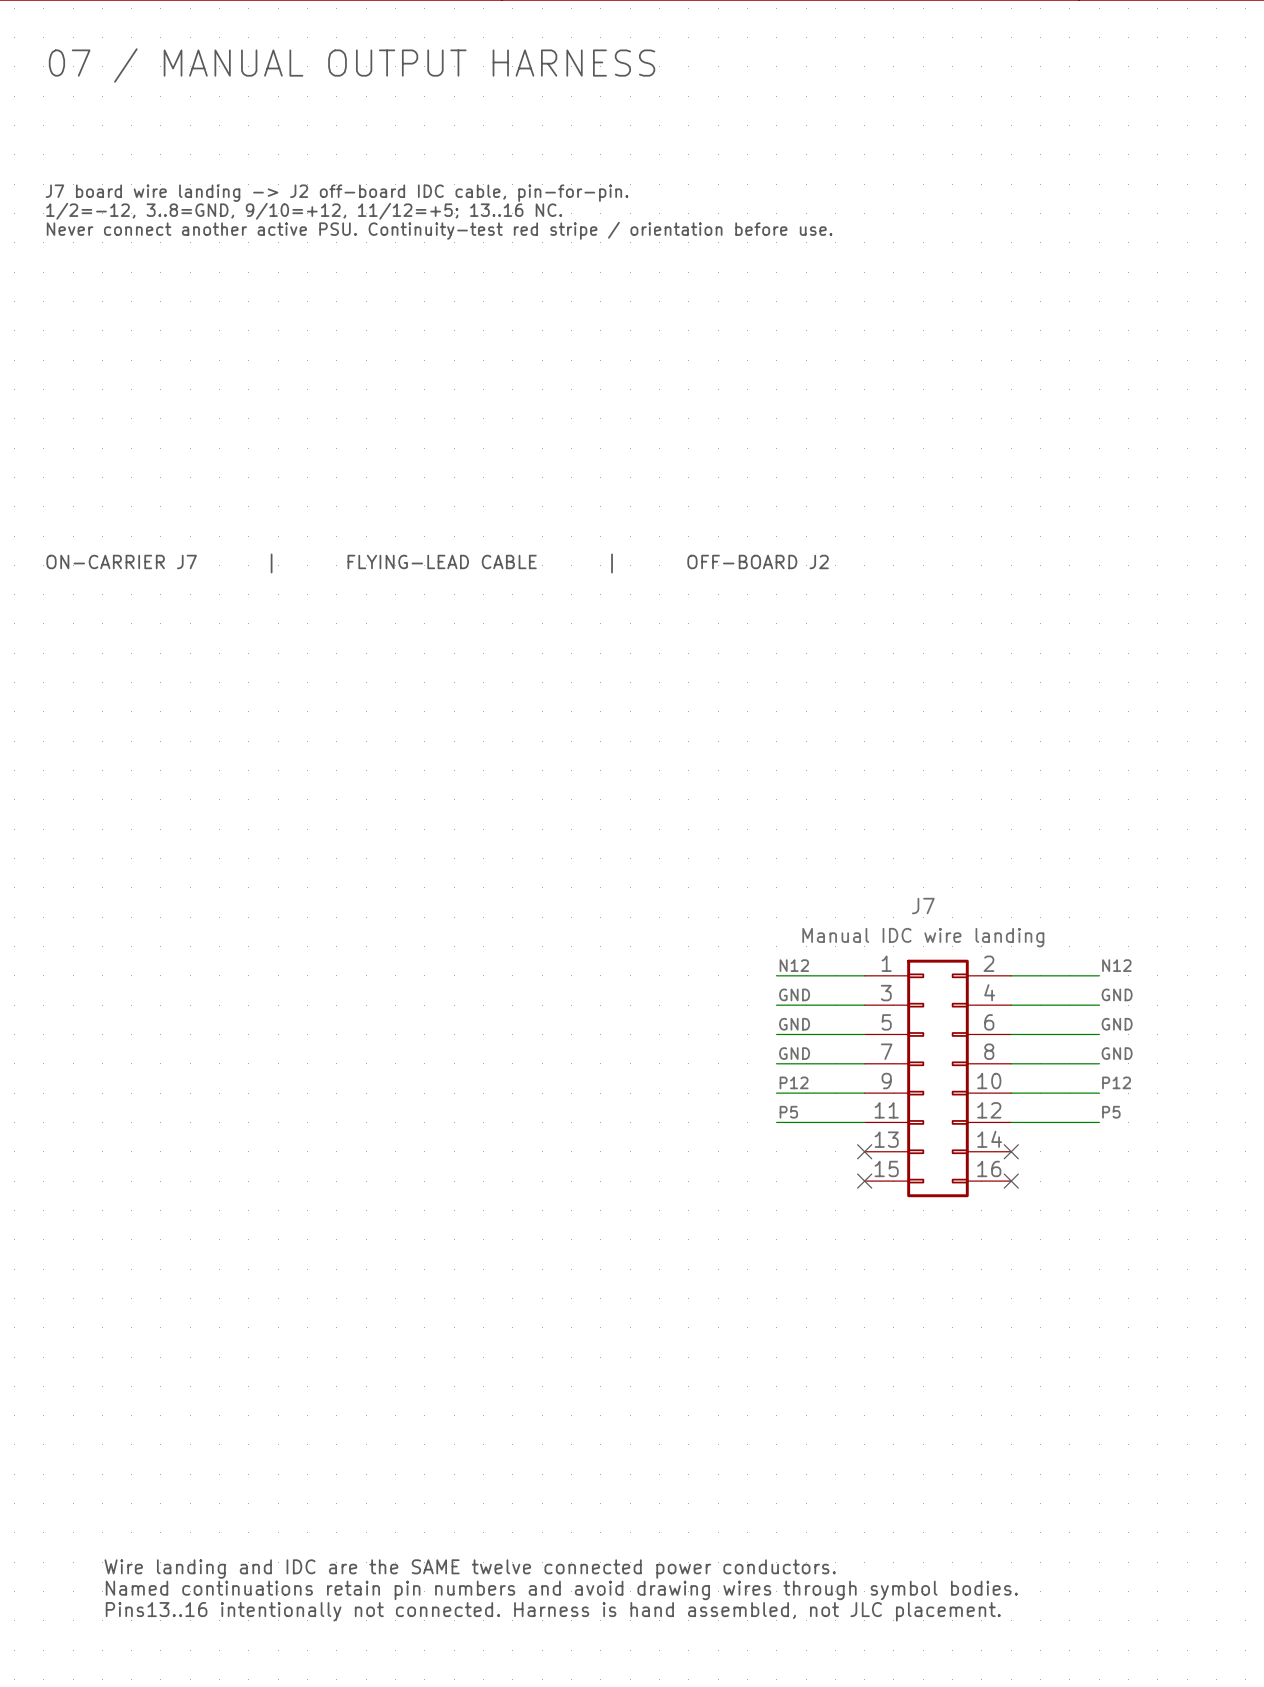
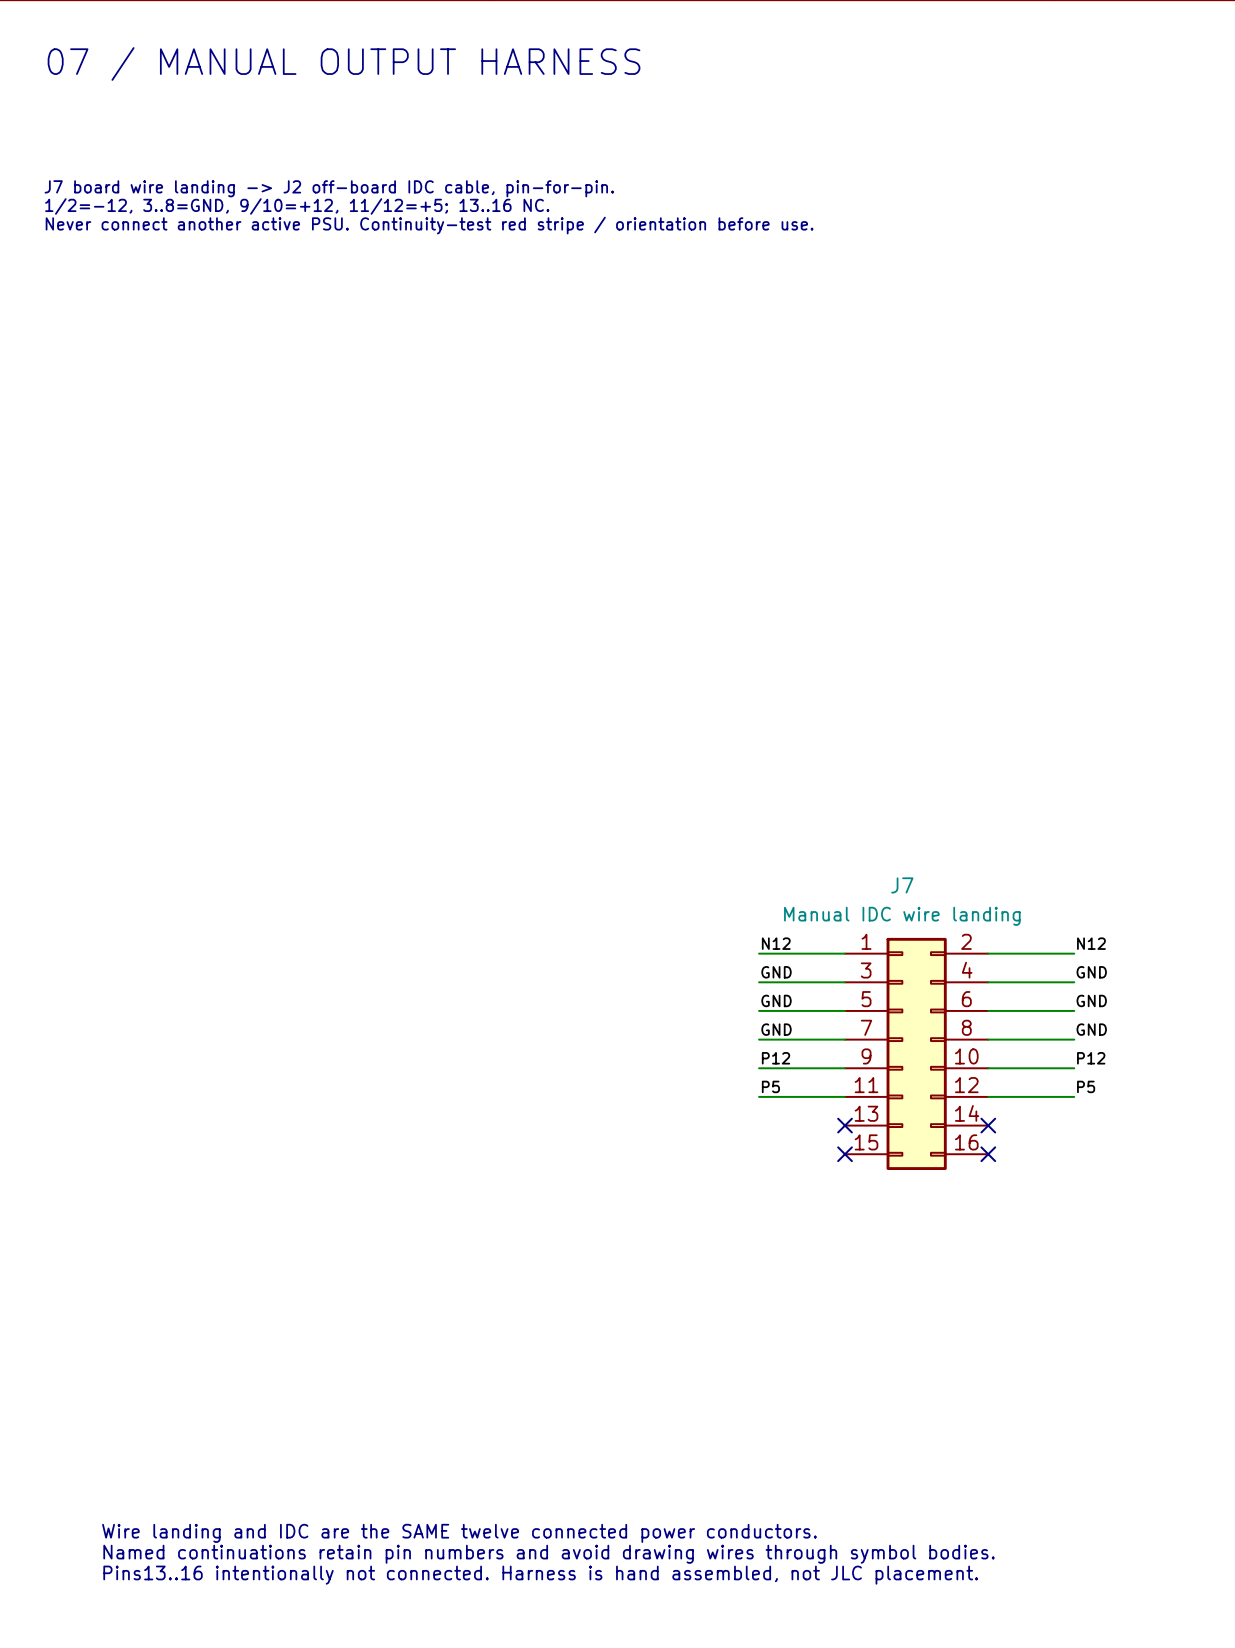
text: ON-CARRIER J7 | FLYING-LEAD CABLE | OFF-BOARD J2 (437, 563) -> none

